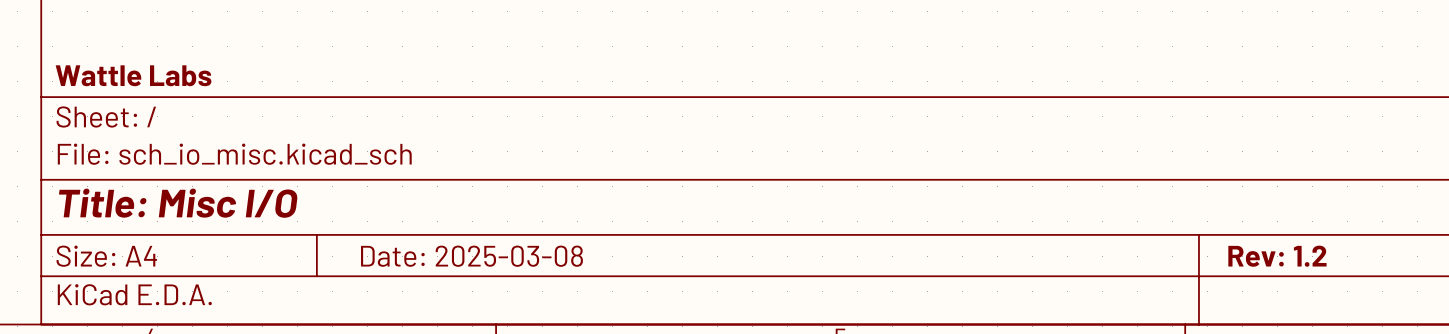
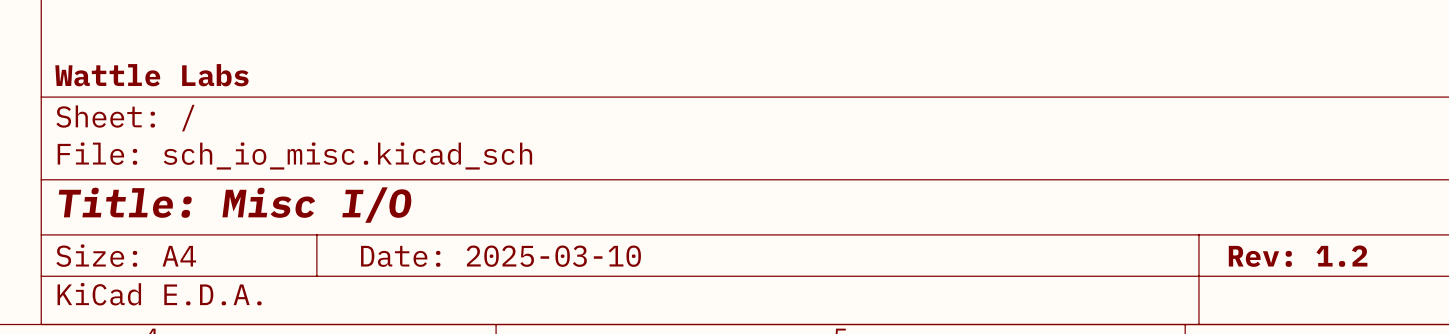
title block: Date: 2025-03-08 (471, 256) -> Date: 2025-03-10 (500, 256)

